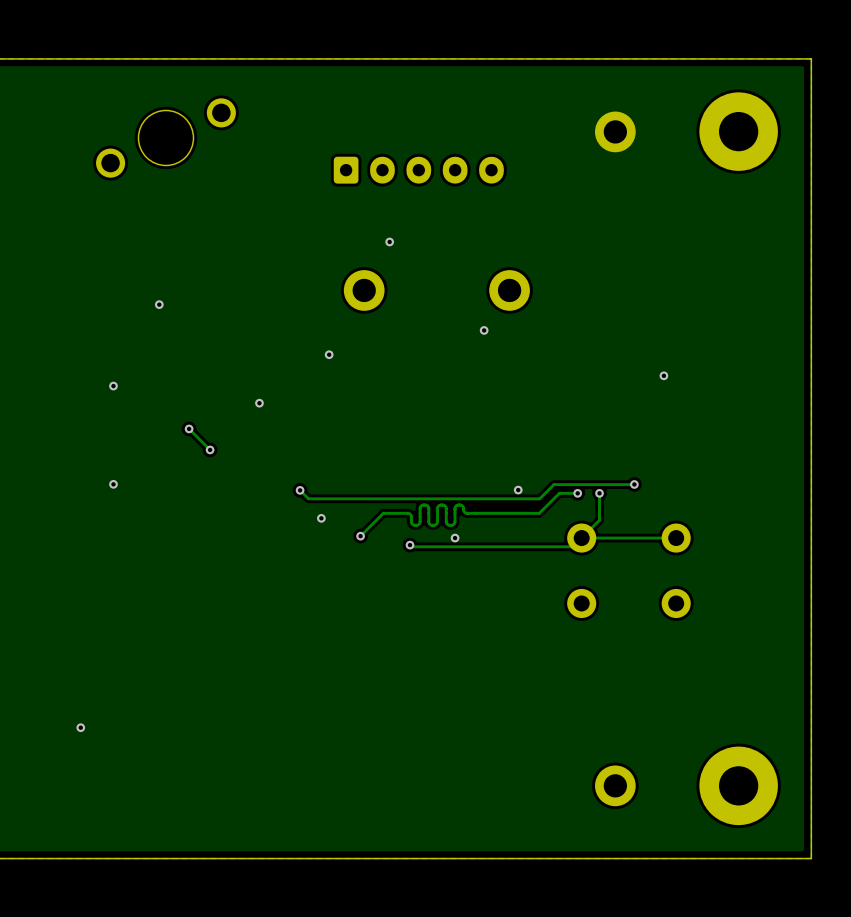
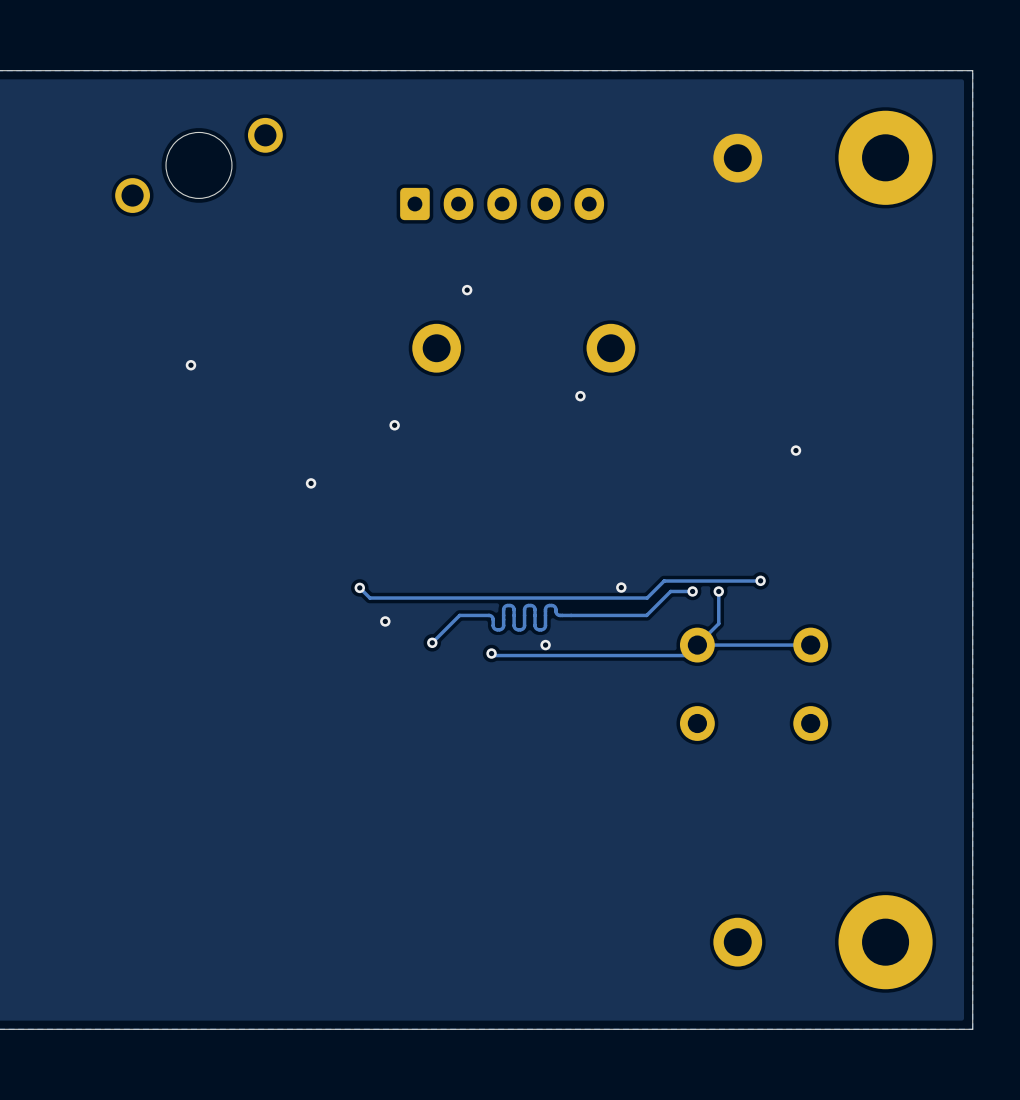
via: (113, 386) -> none
track: (189, 428) (210, 449) -> none
via: (189, 428) -> none
via: (210, 449) -> none
via: (113, 484) -> none
via: (80, 727) -> none

